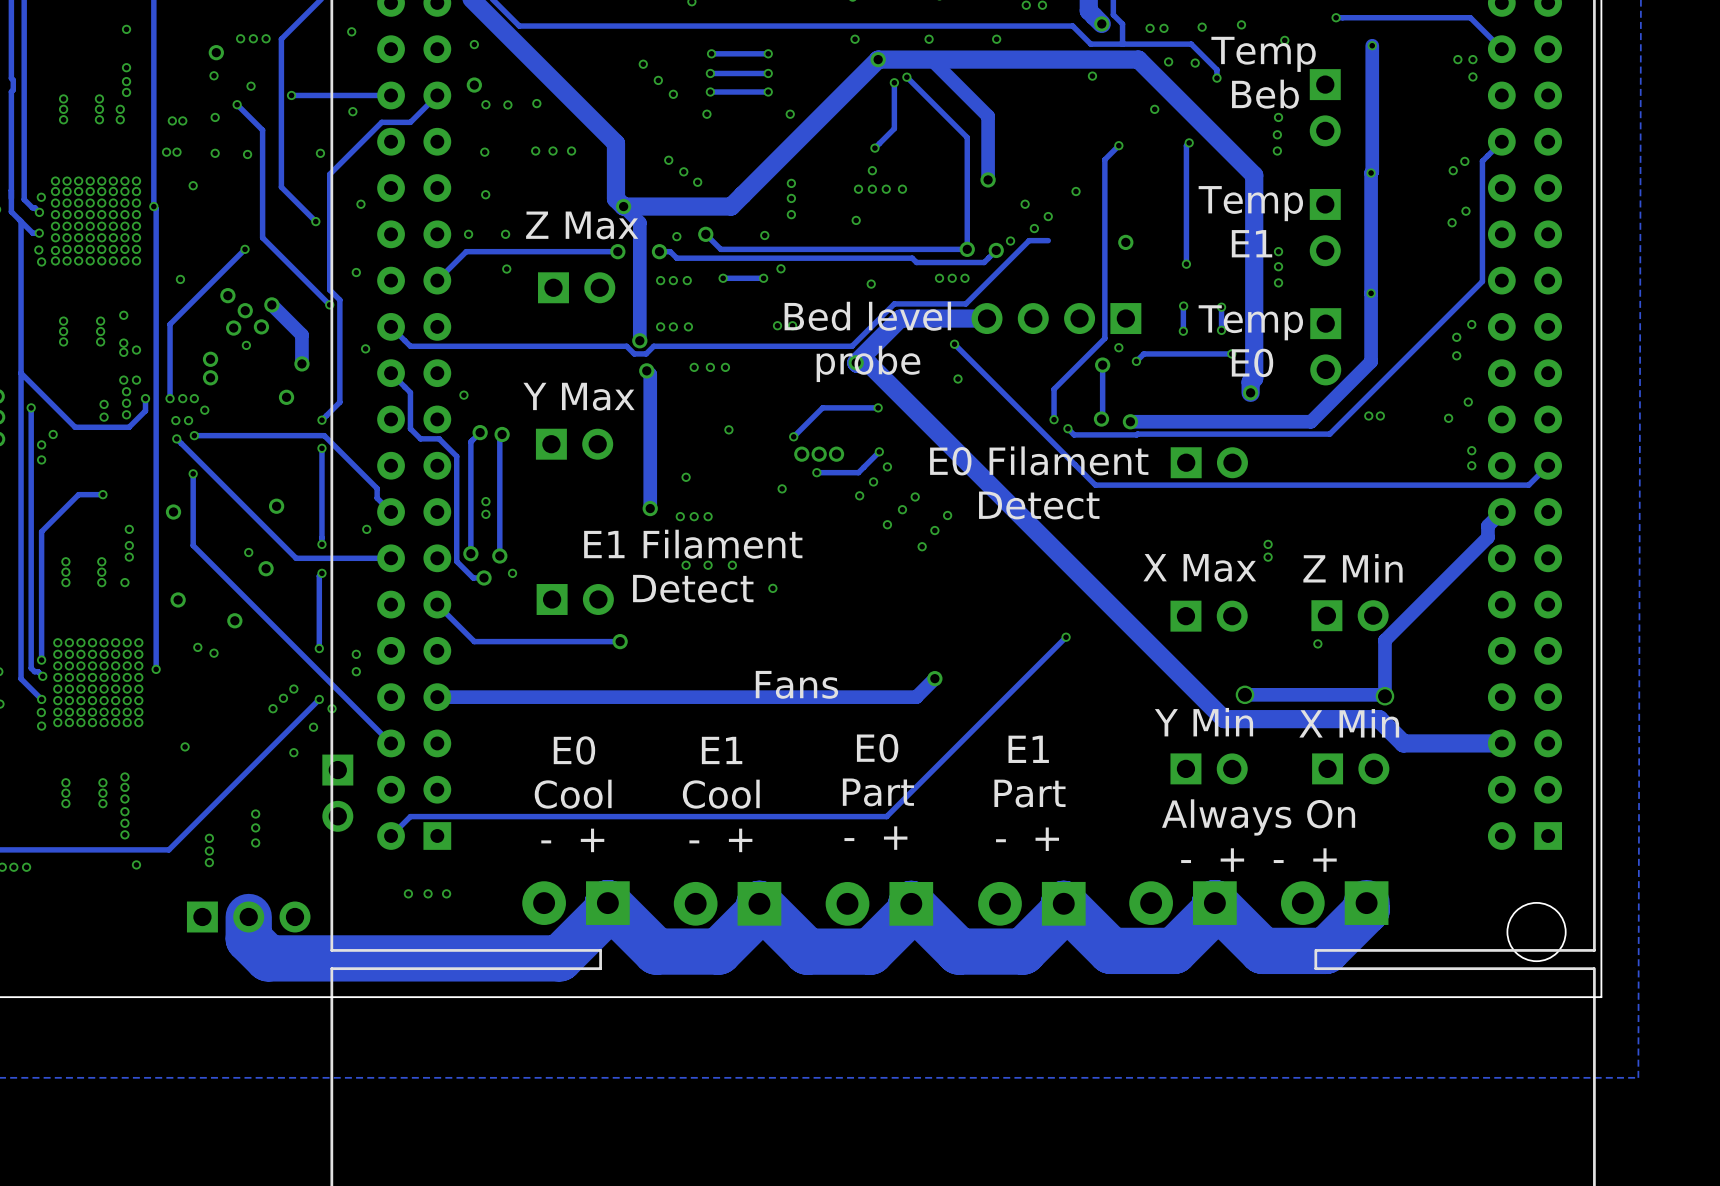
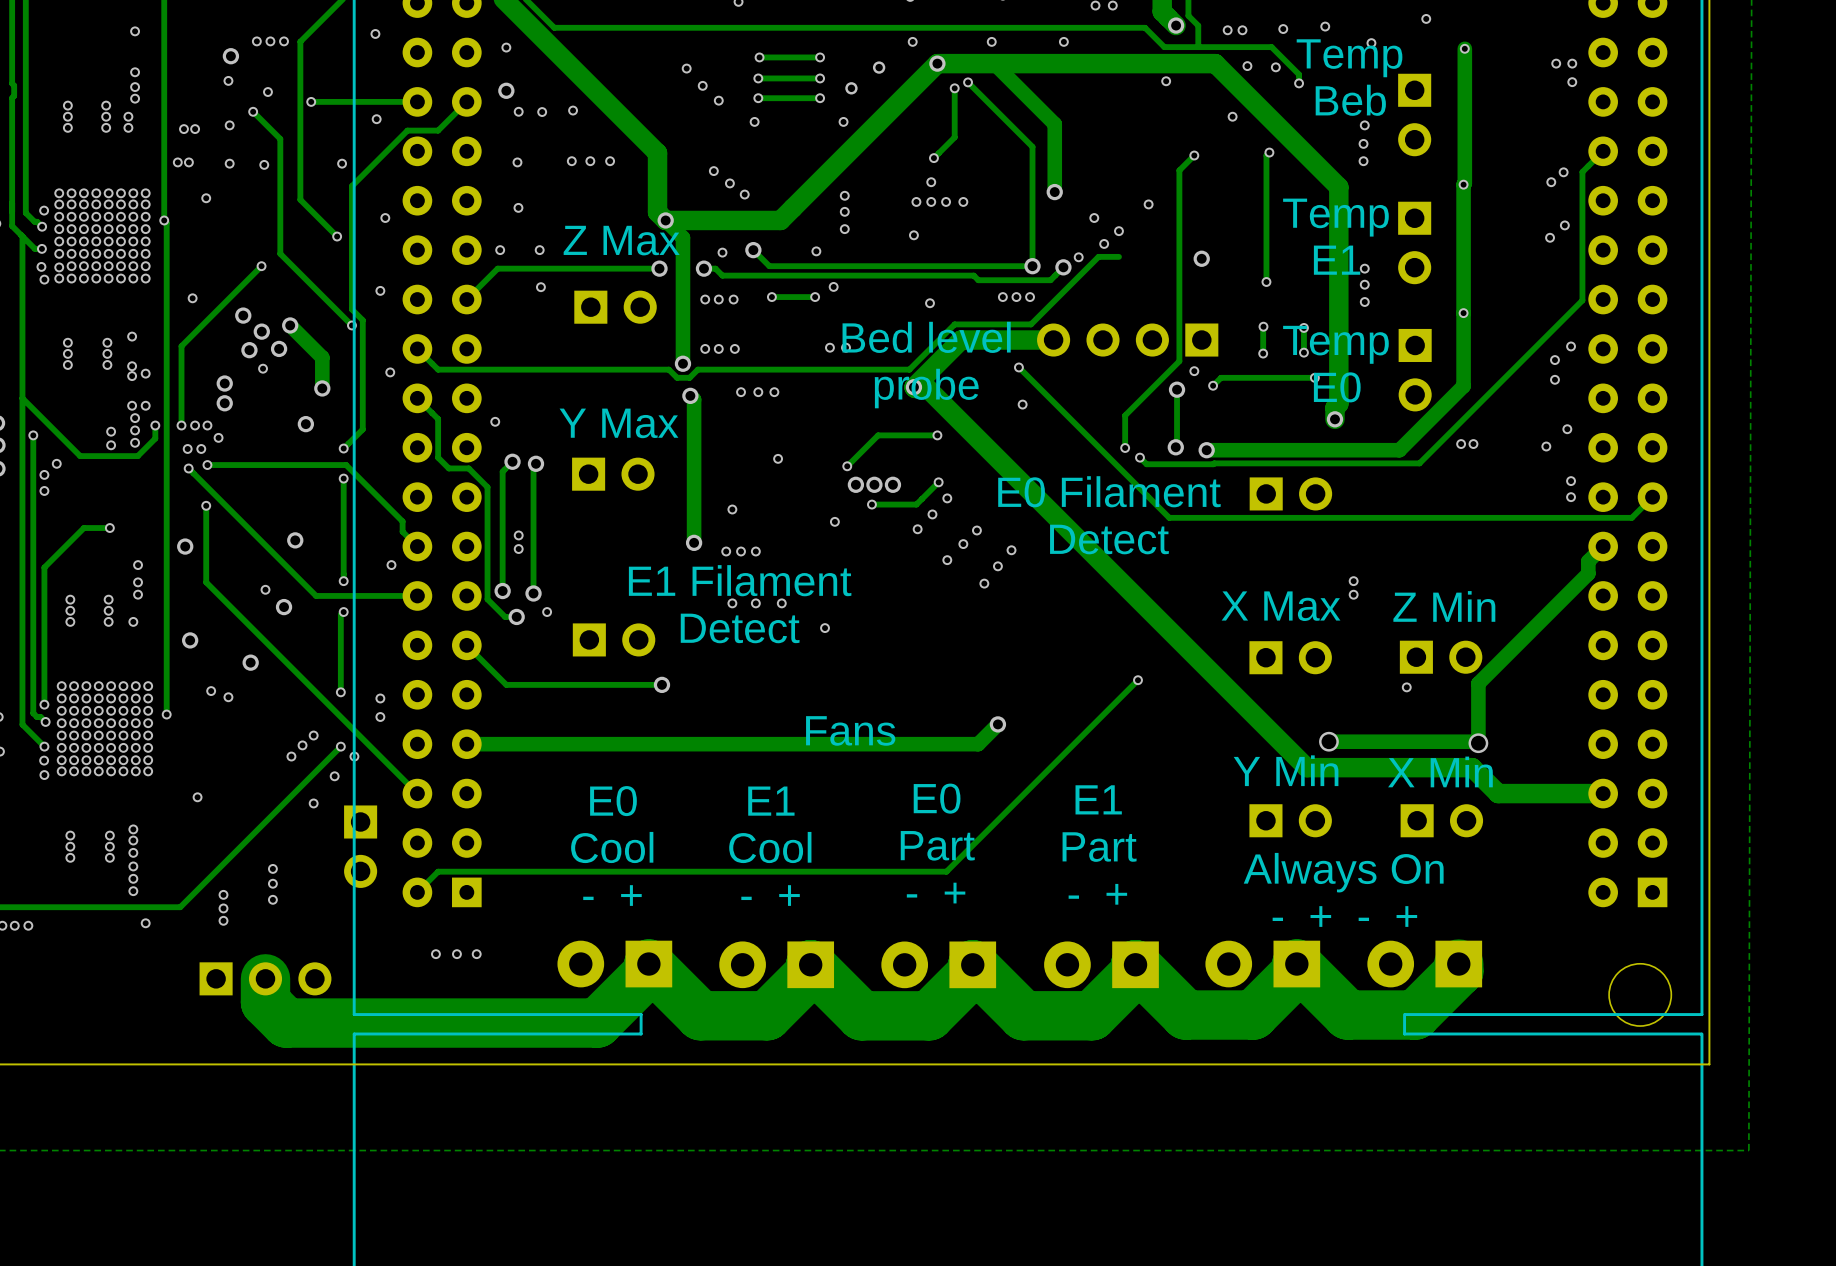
track: (1336, 17) (1470, 17) (1501, 49) -> none
via: none -> (879, 67)
via: none -> (851, 88)

